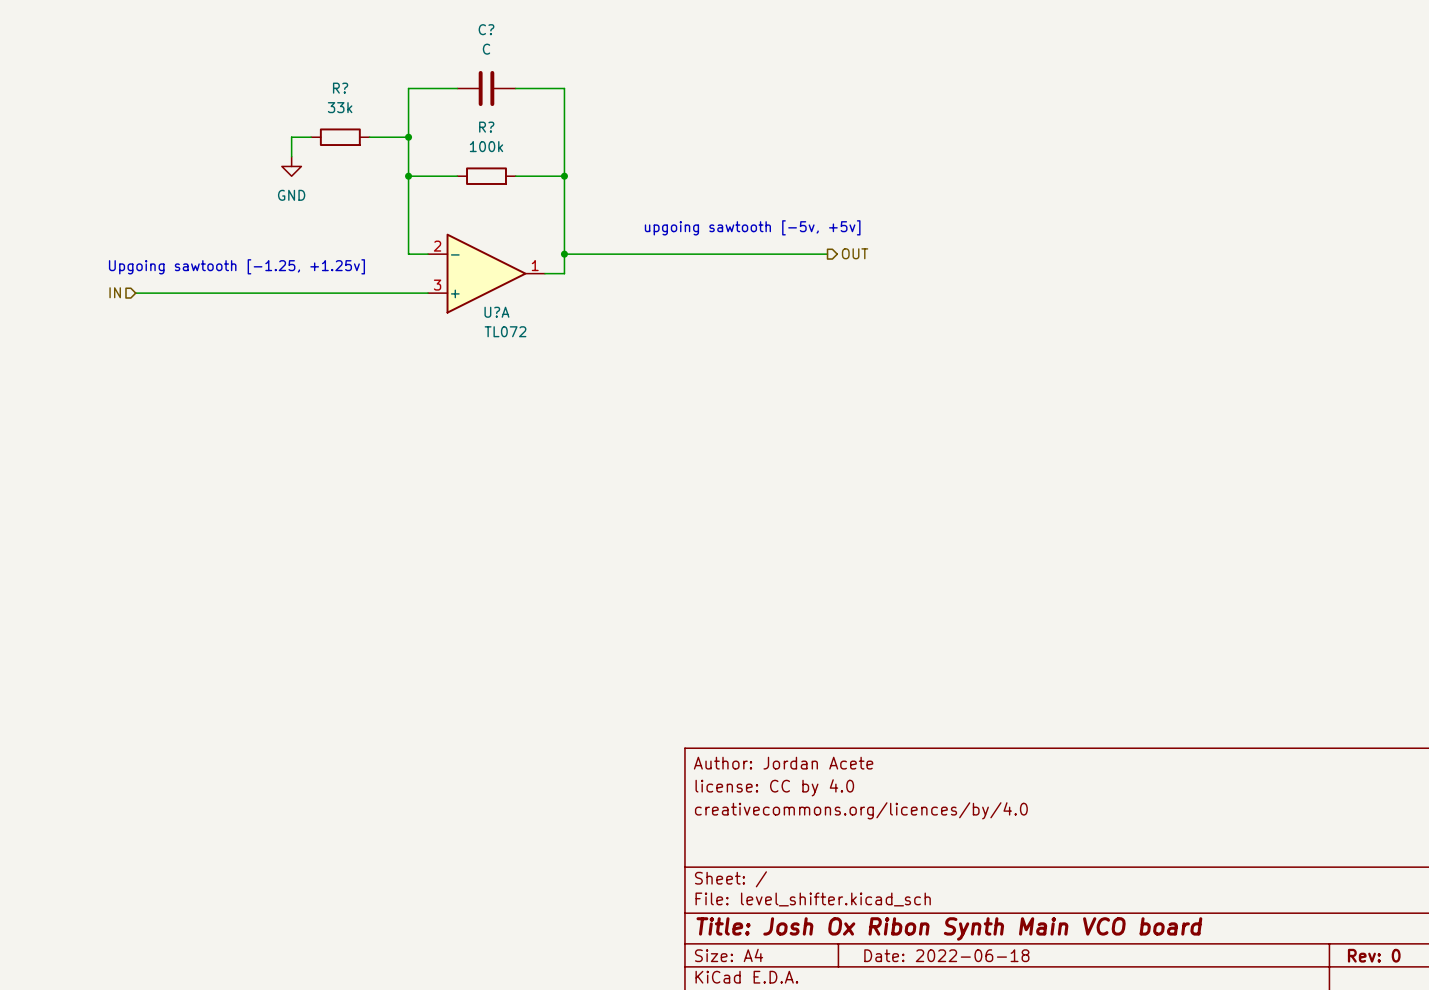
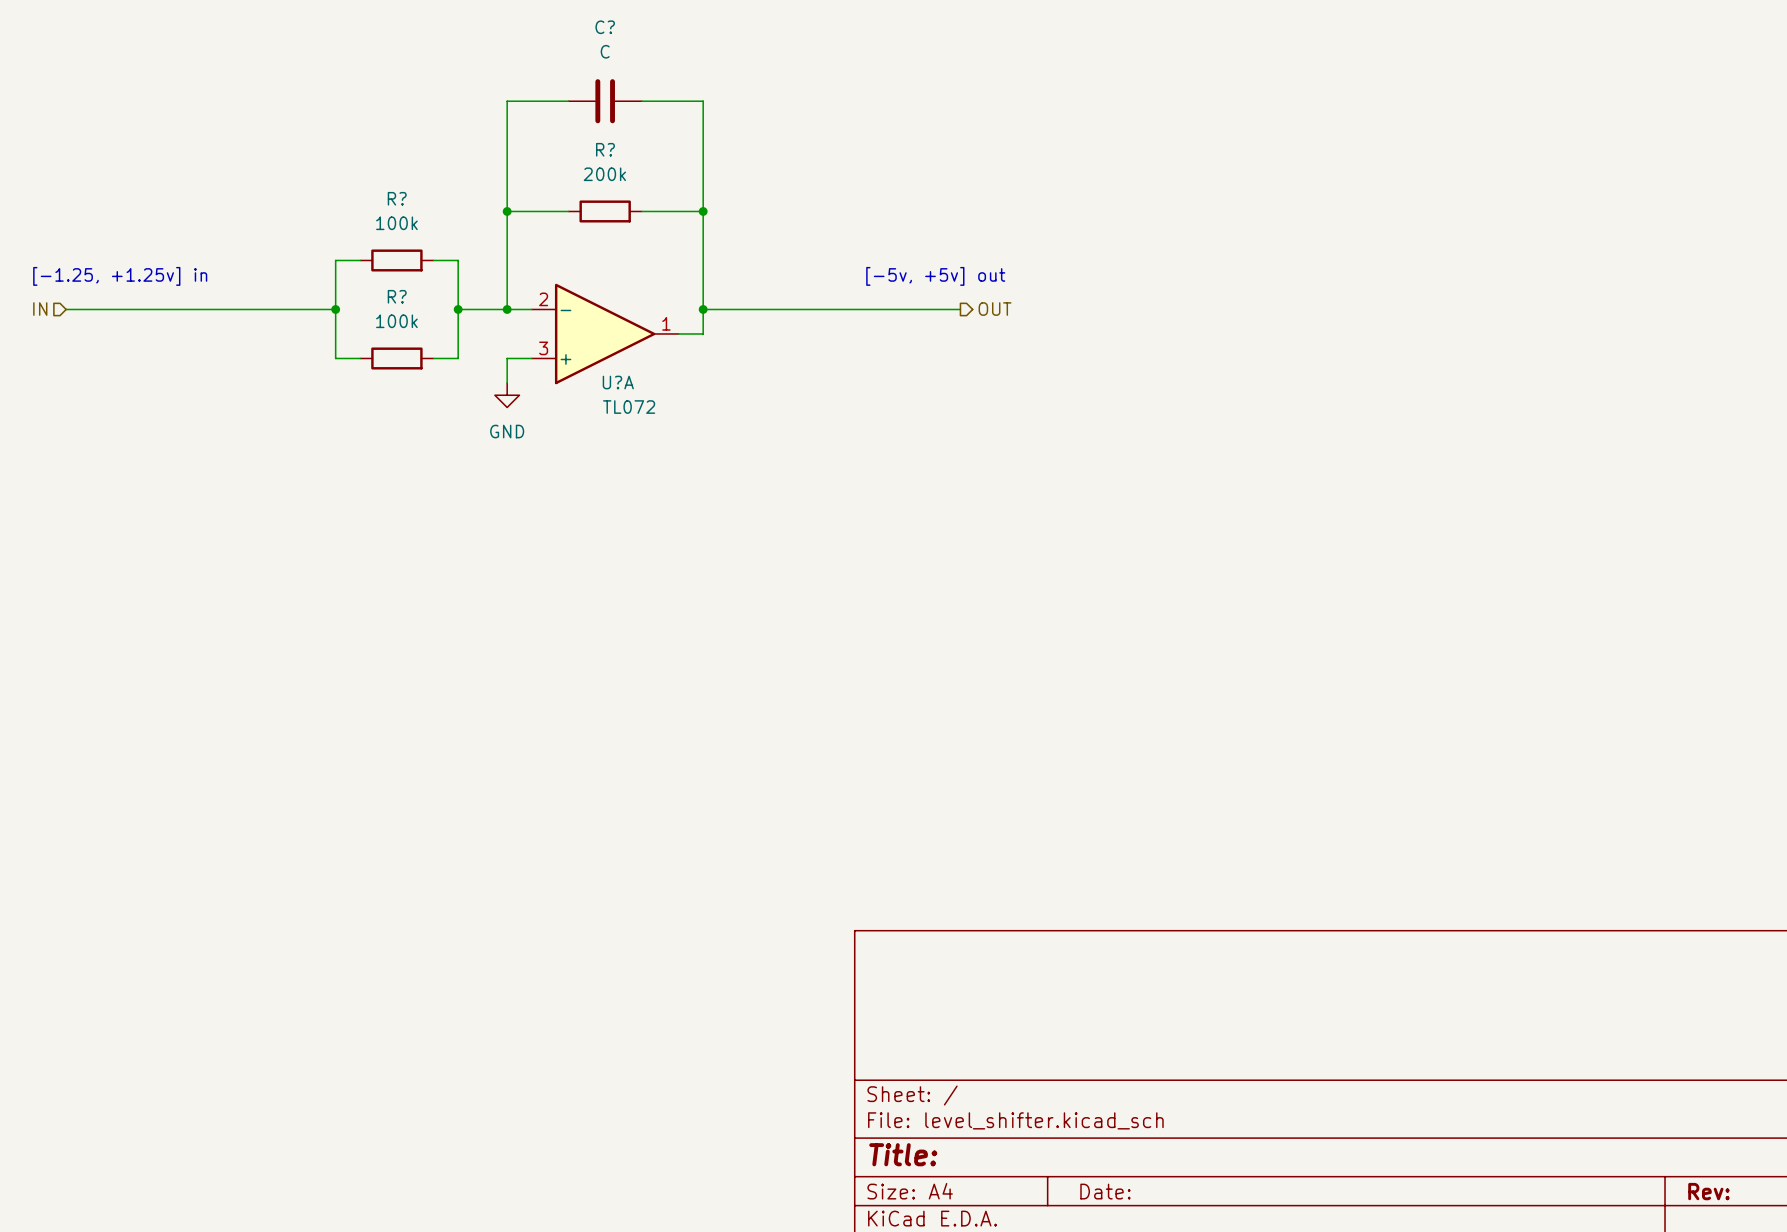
wire: (311, 137) (291, 137) (291, 156) -> none
R?: 33k (340, 137) -> none
wire: (369, 137) (408, 137) -> (458, 309) (507, 309)
junction: (408, 137) -> none
R? value: 100k (486, 146) -> 200k (604, 174)
power symbol: GND (291, 166) -> none
R?: none -> 100k (396, 260)
wire: none -> (433, 260) (458, 260) (458, 358)
text: none -> [-1.25, +1.25v] in (120, 276)
text: none -> [-5v, +5v] out (935, 276)
text: upgoing sawtooth [-5v, +5v] (752, 227) -> none
hierarchical label position: OUT (855, 253) -> OUT (995, 309)
wire: none -> (66, 309) (335, 309)
junction: none -> (335, 309)
junction: none -> (458, 309)
junction: none -> (507, 309)
wire: (769, 254) (827, 254) -> none
text: Upgoing sawtooth [-1.25, +1.25v] (236, 266) -> none
hierarchical label position: IN (115, 292) -> IN (40, 309)
wire: (135, 293) (272, 293) -> (360, 260) (335, 260) (335, 358)
wire: (291, 293) (350, 293) -> none
R?: none -> 100k (396, 358)
wire: (369, 293) (408, 293) -> (507, 382) (507, 358)
power symbol: none -> GND (507, 395)
title block: Author: Jordan Acete (783, 763) -> none
title block: license: CC by 4.0 (774, 787) -> none
title block: creativecommons.org/licences/by/4.0 (861, 810) -> none
title block: Title: Josh Ox Ribon Synth Main VCO board (949, 928) -> Title: (903, 1154)
title block: Date: 2022-06-18 (946, 955) -> Date: (1105, 1191)
title block: Rev: 0 (1374, 955) -> Rev: (1708, 1191)

